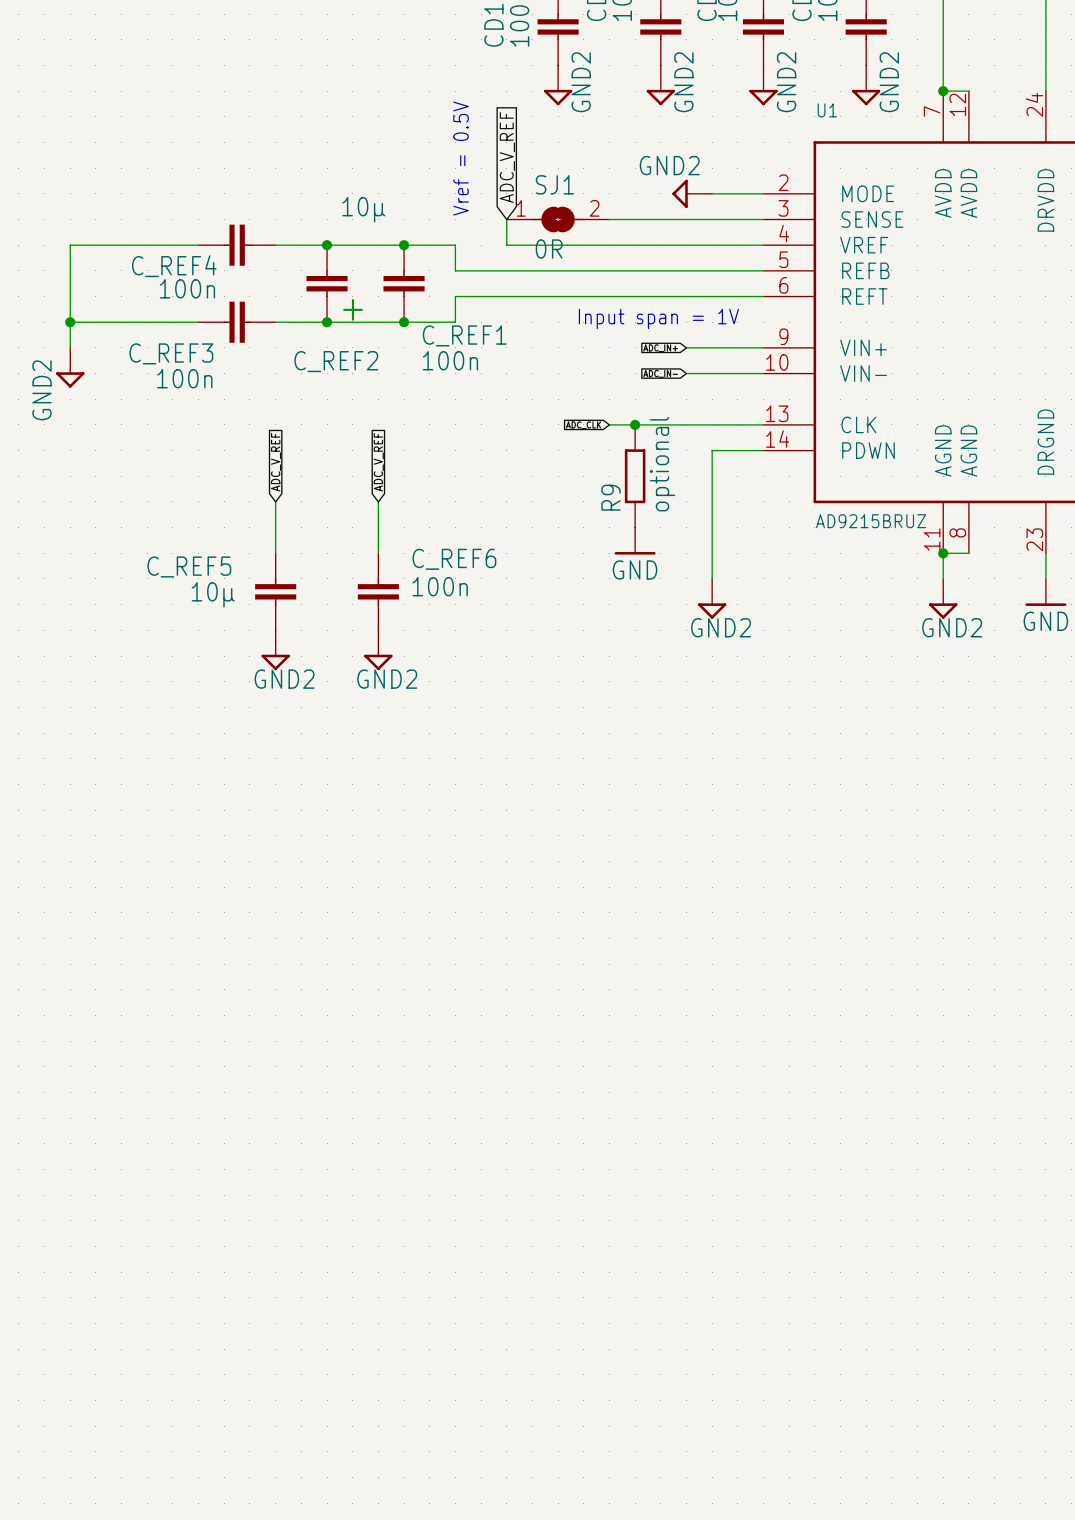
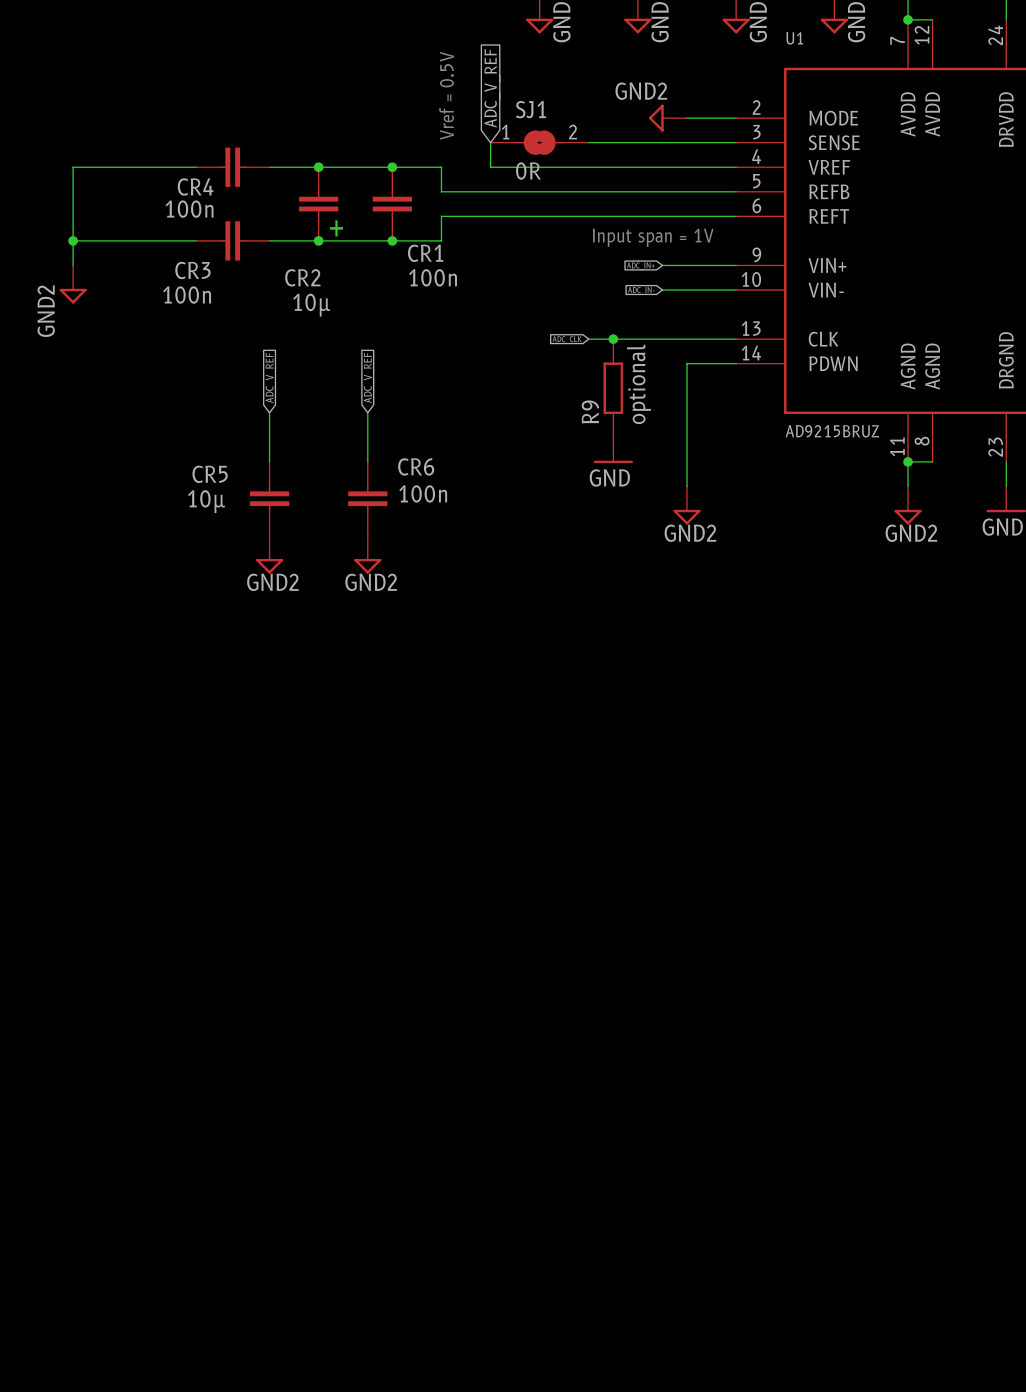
C_REF2 value position: 10µ (363, 209) -> 10µ (311, 305)
C_REF4 name: C_REF4 (174, 266) -> CR4 (195, 186)
C_REF1 name: C_REF1 (464, 335) -> CR1 (425, 253)
C_REF3 name: C_REF3 (171, 353) -> CR3 (192, 270)
C_REF2 name: C_REF2 (336, 361) -> CR2 (302, 277)
C_REF6 name: C_REF6 (454, 559) -> CR6 (416, 466)
C_REF5 name: C_REF5 (189, 566) -> CR5 (210, 474)

